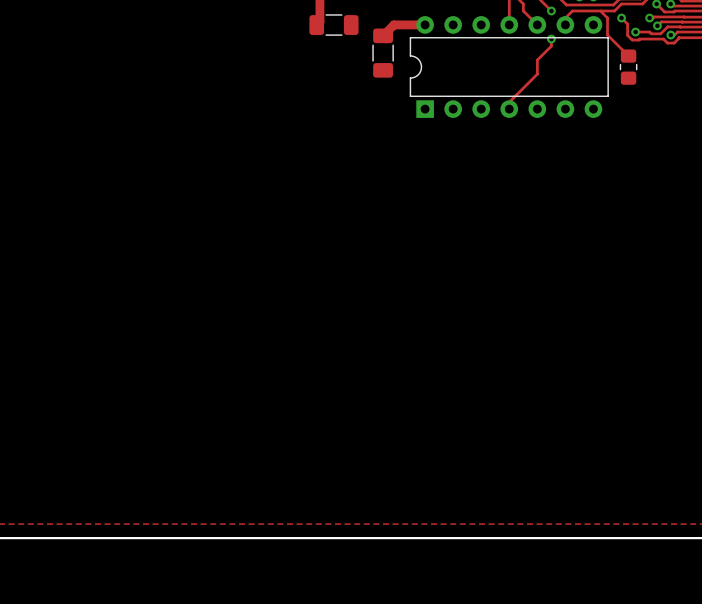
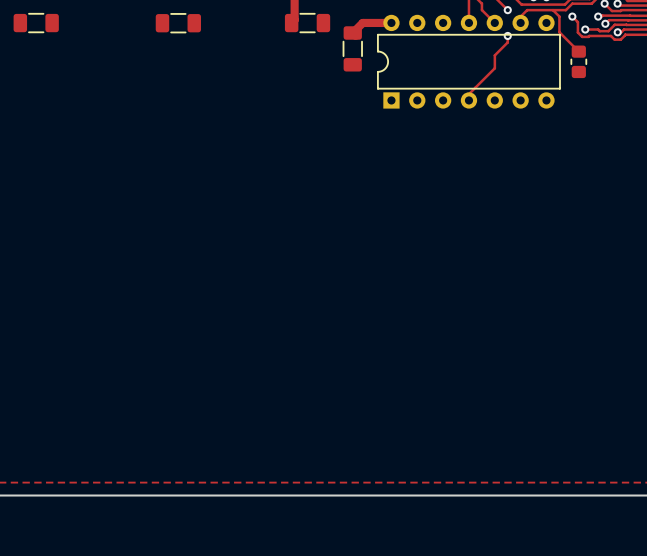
part: none -> (36, 23)
part: none -> (178, 23)

